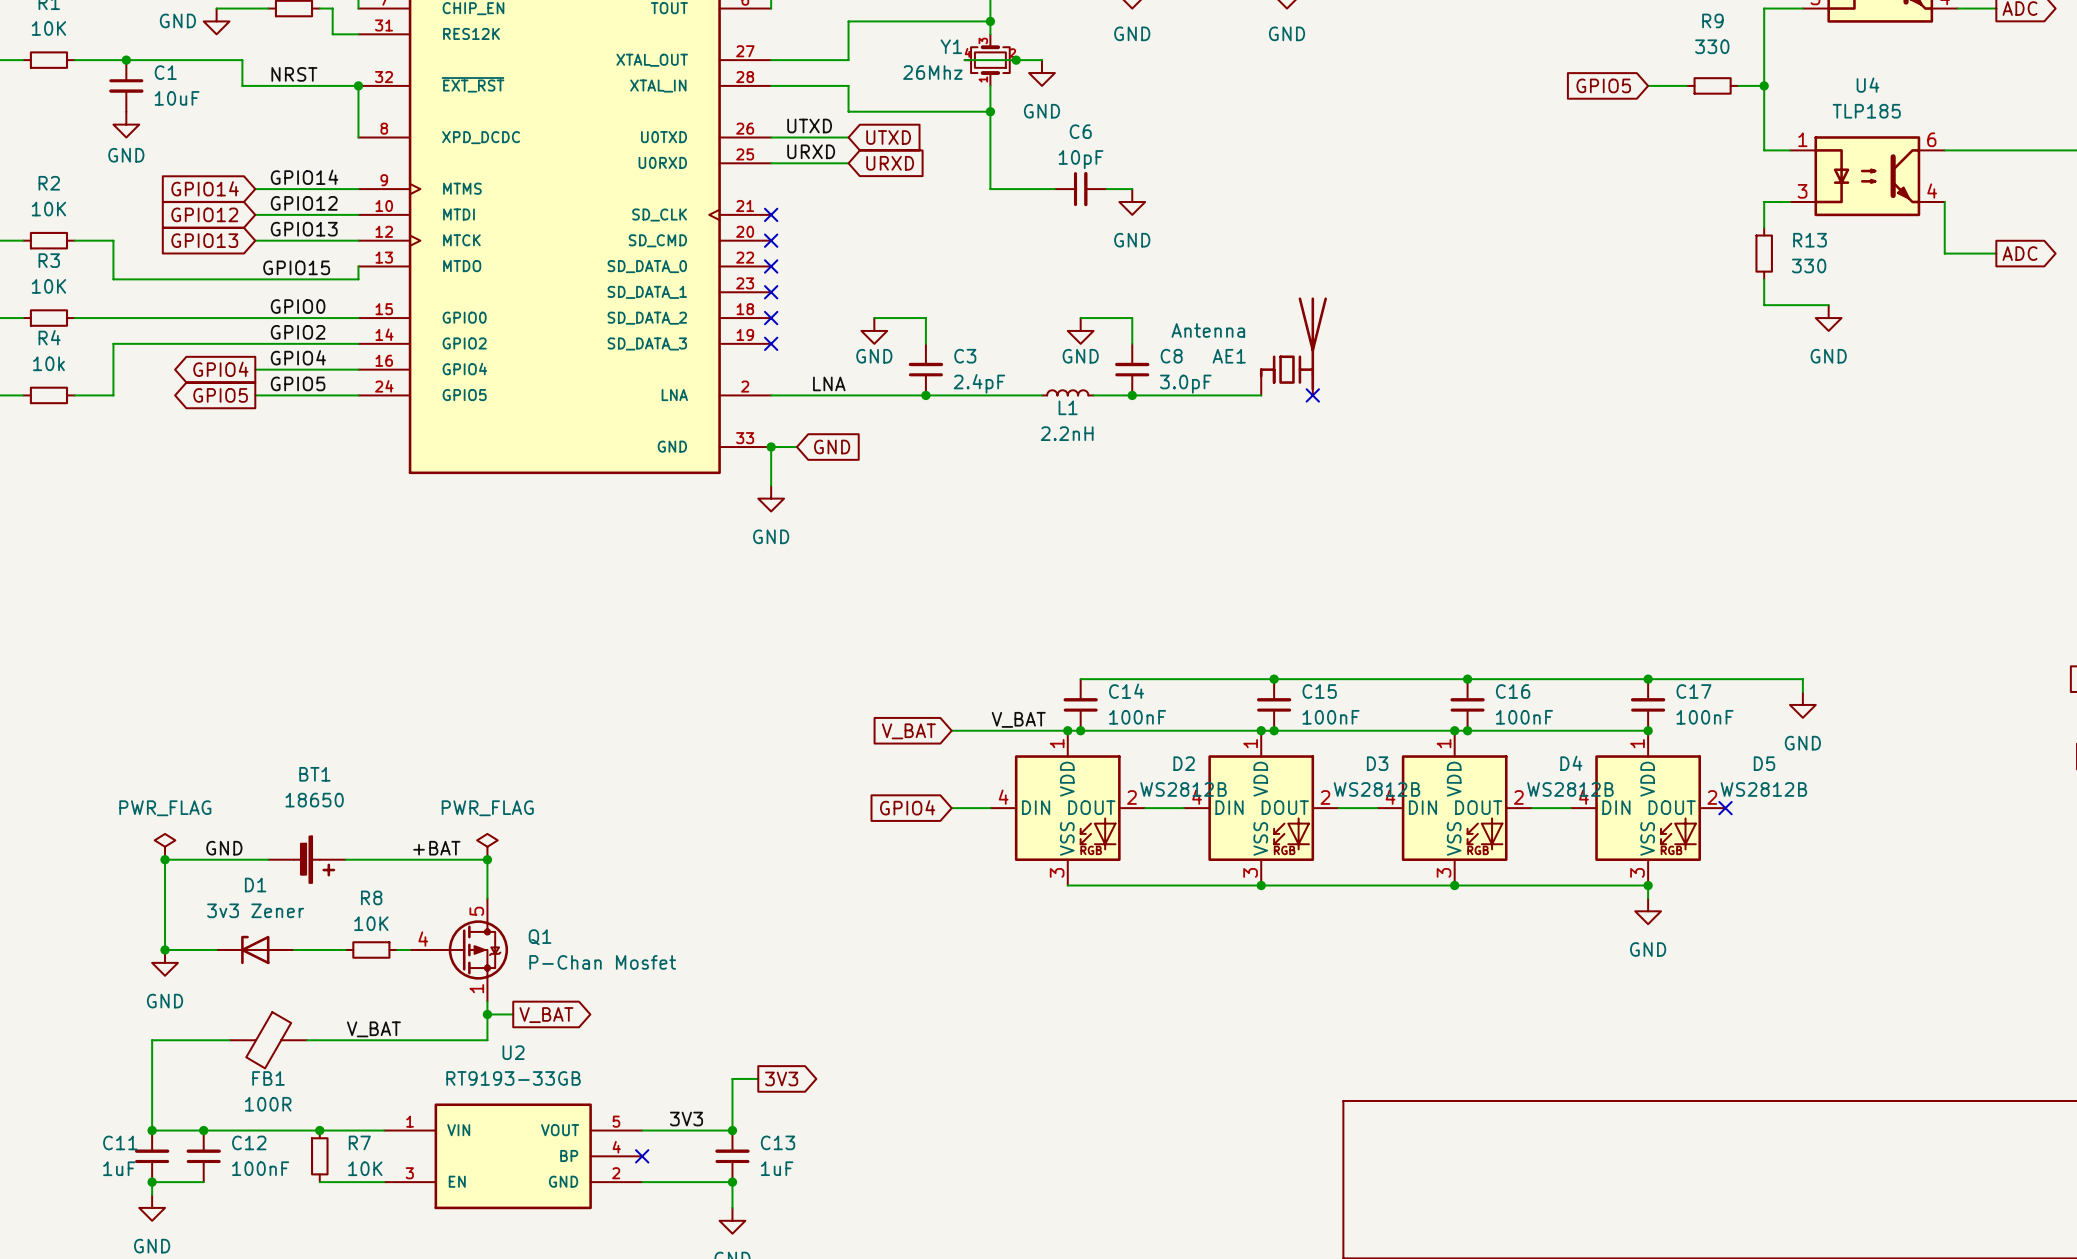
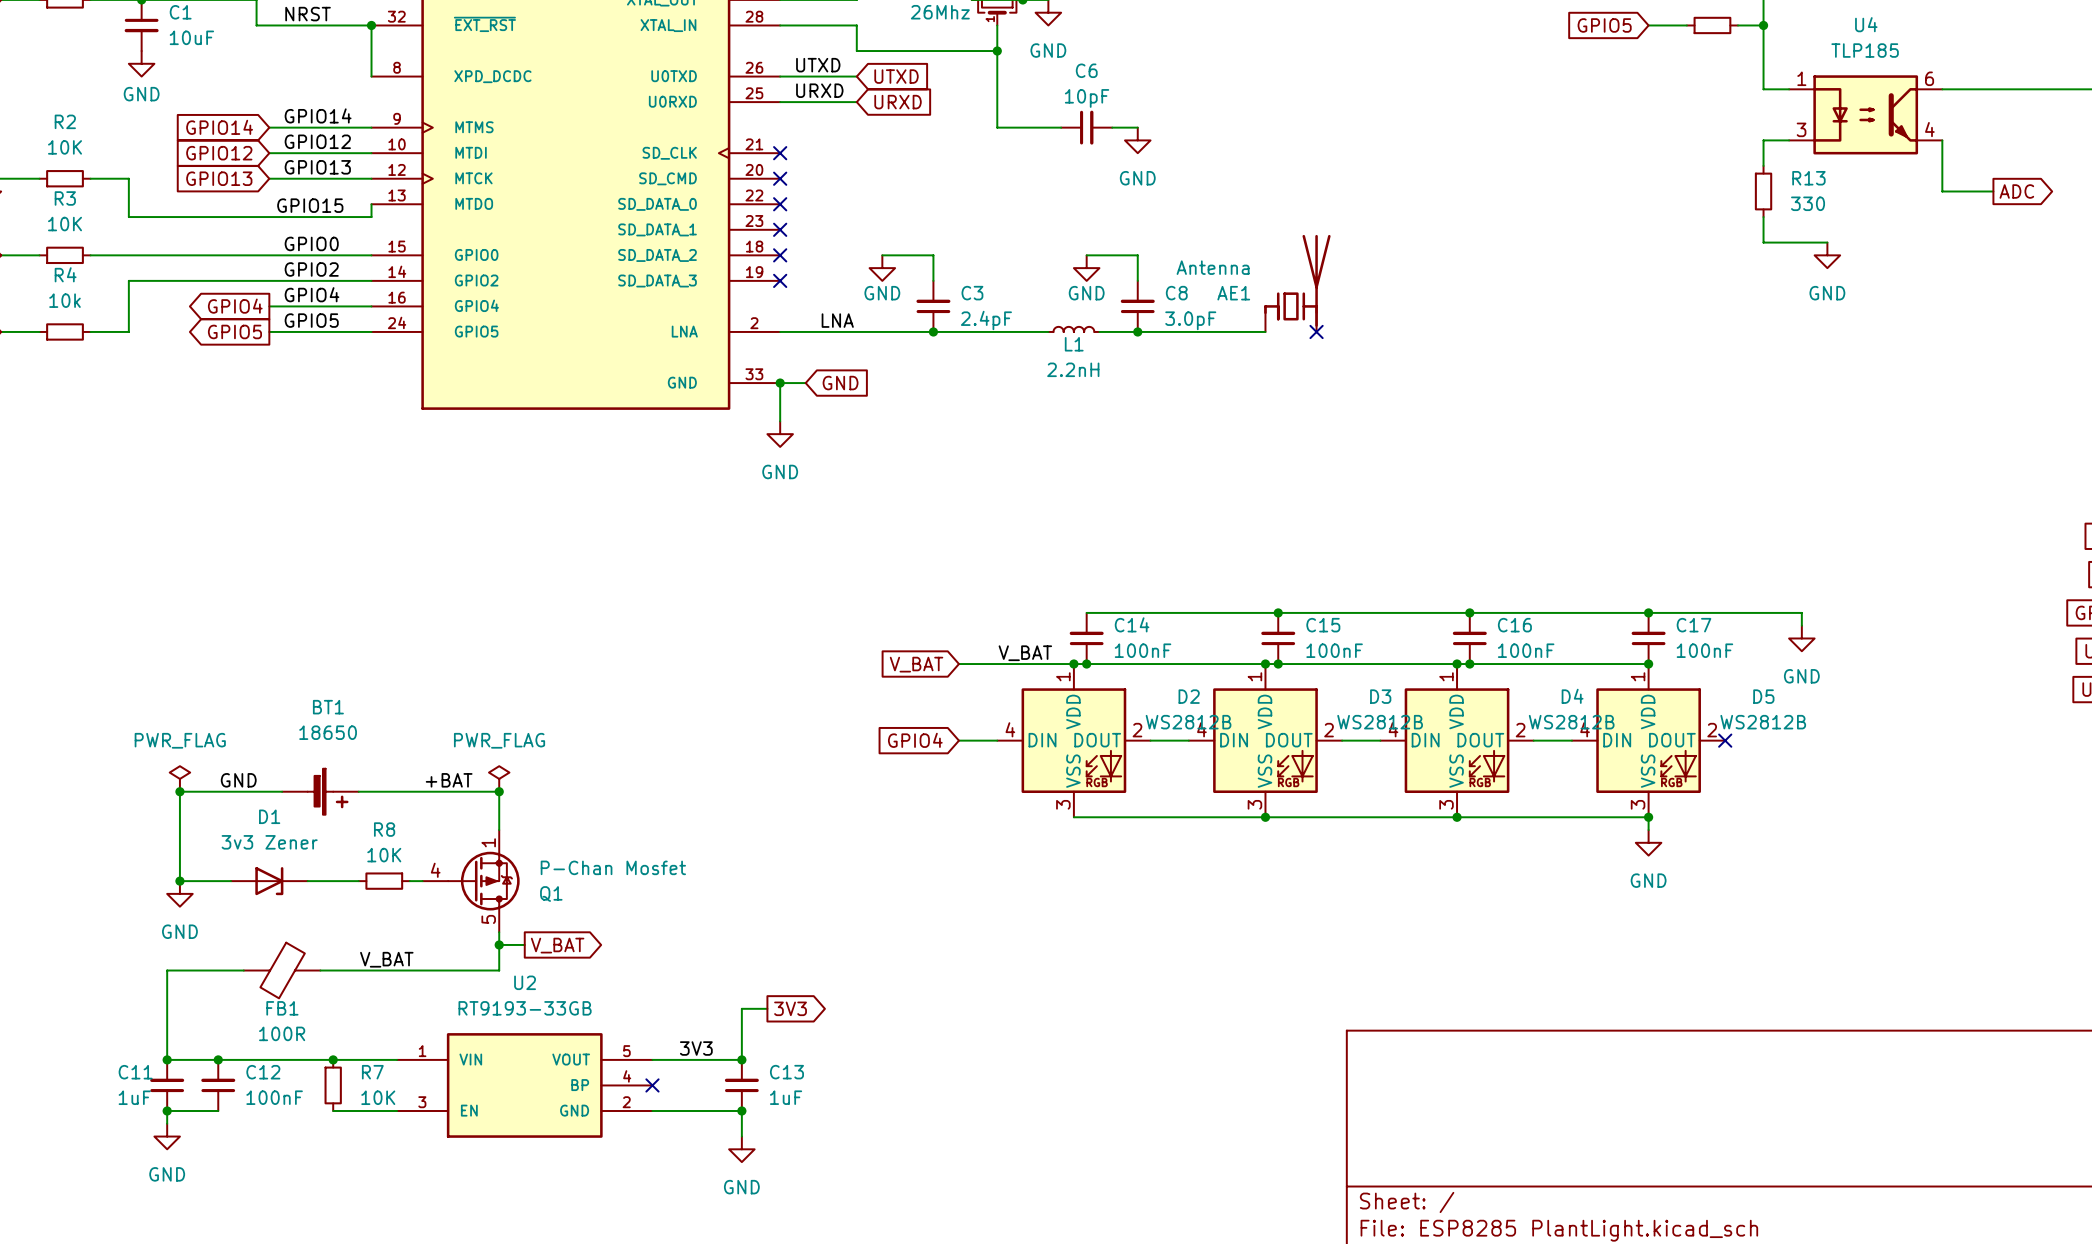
D1 rotation: 0° (255, 949) -> 180° (269, 881)
Q1 flip: as is (471, 949) -> up-down (483, 881)

